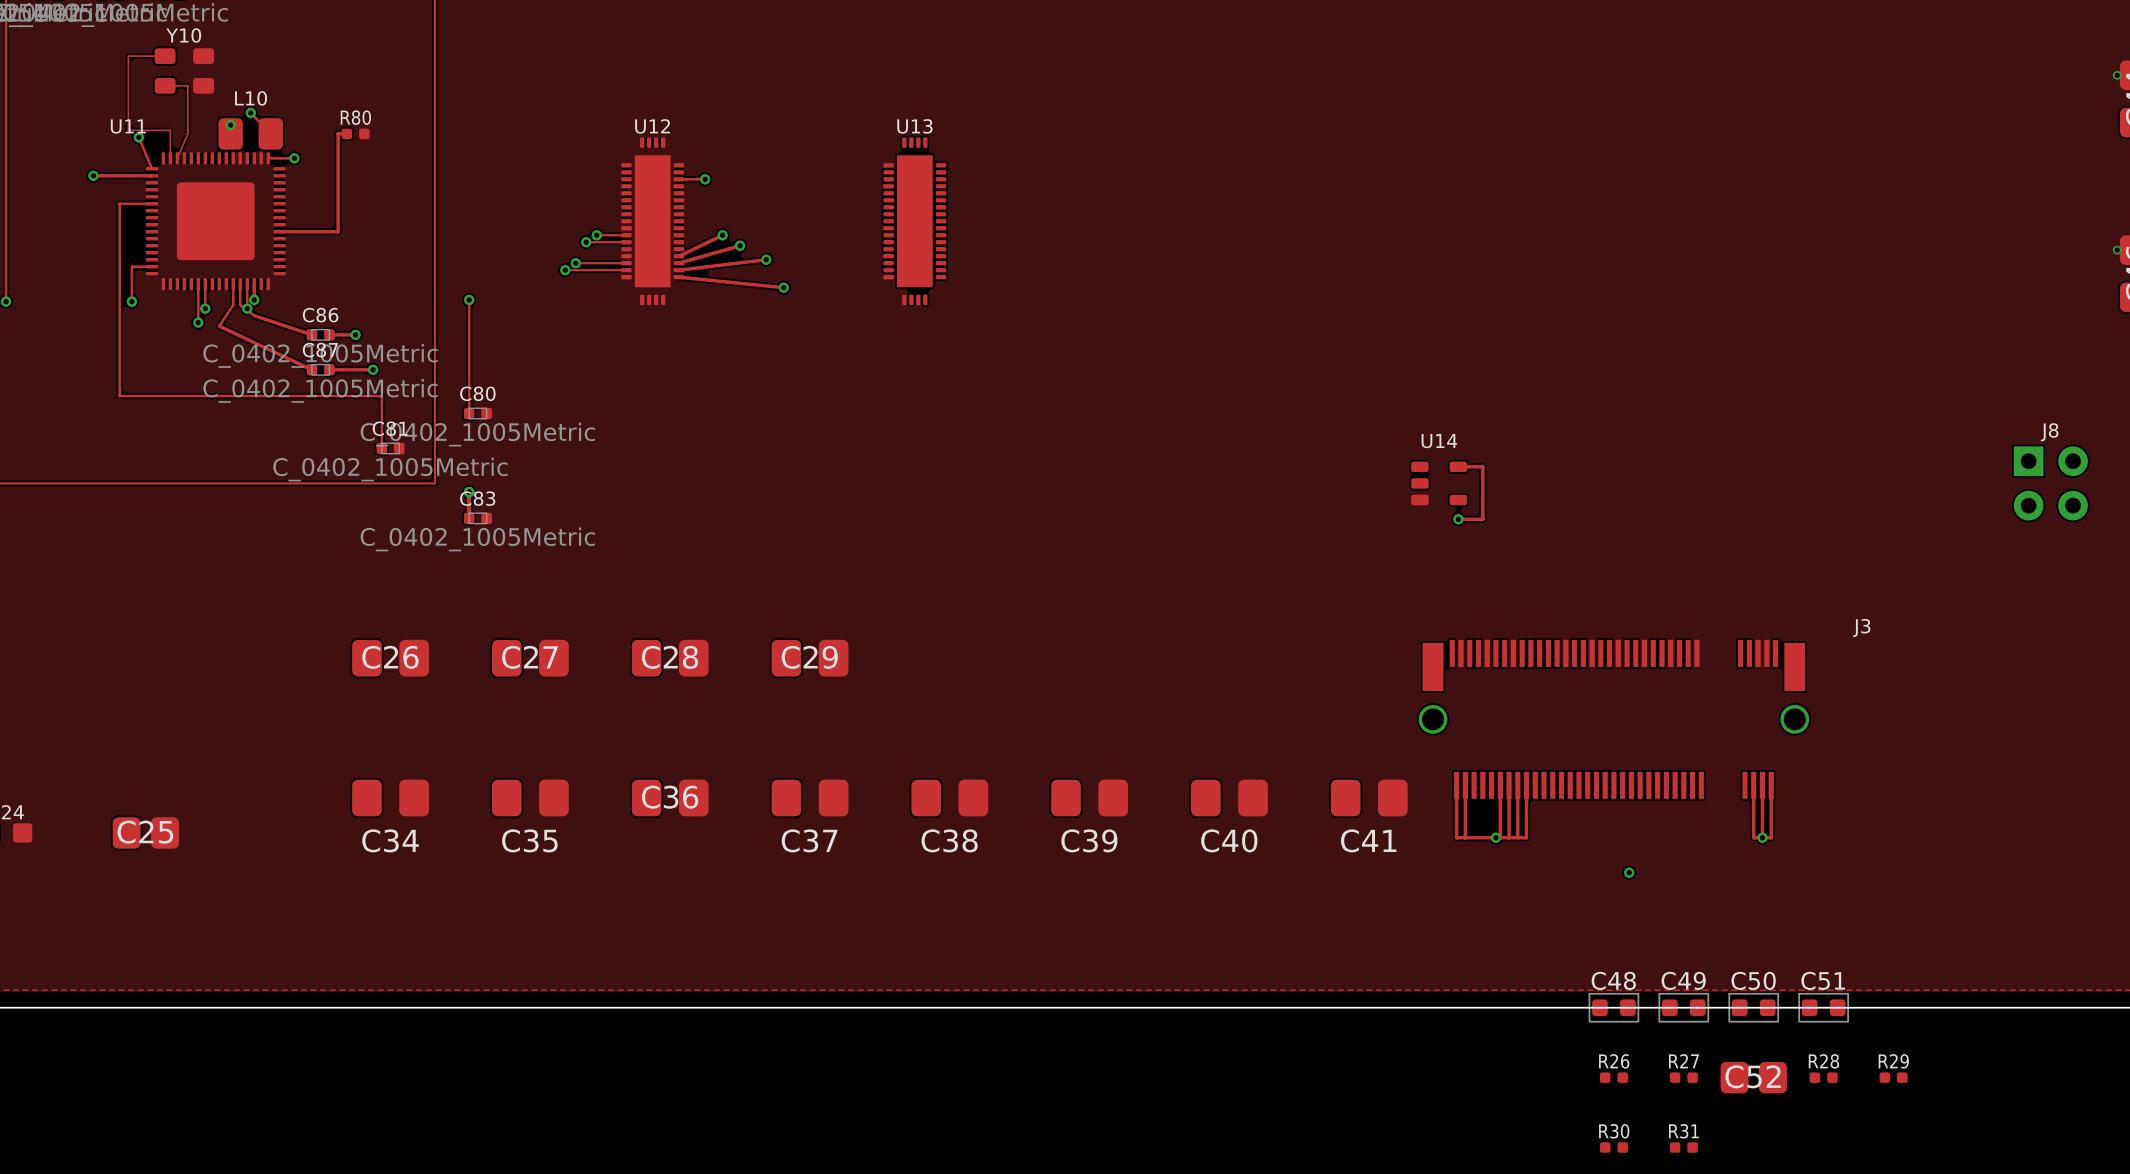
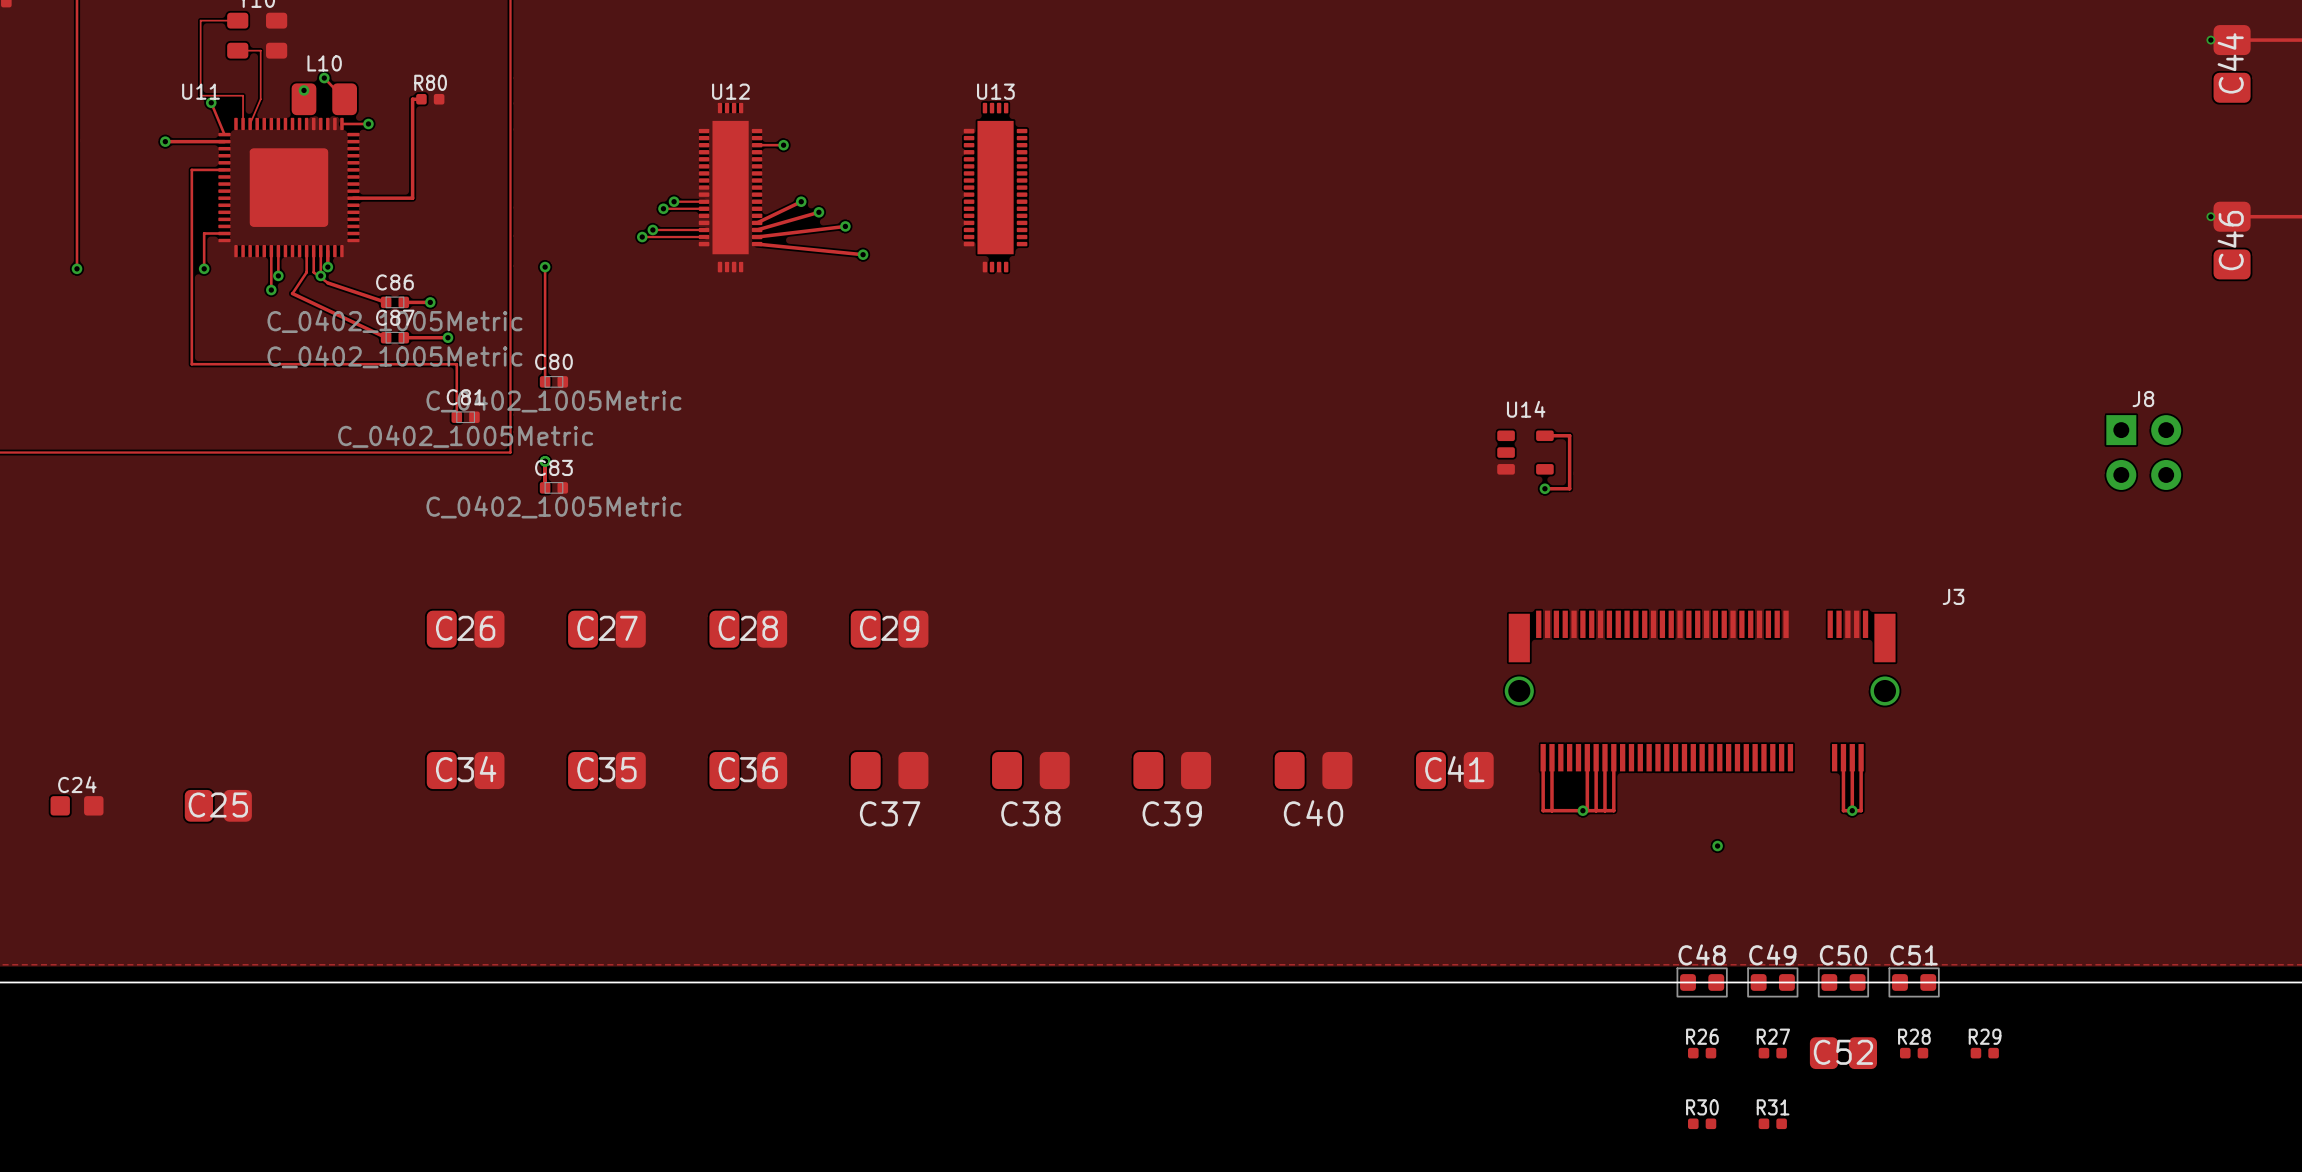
C34 name position: C34 (390, 840) -> C34 (466, 769)
C35 name position: C35 (529, 840) -> C35 (606, 769)
C41 name position: C41 (1368, 840) -> C41 (1454, 769)

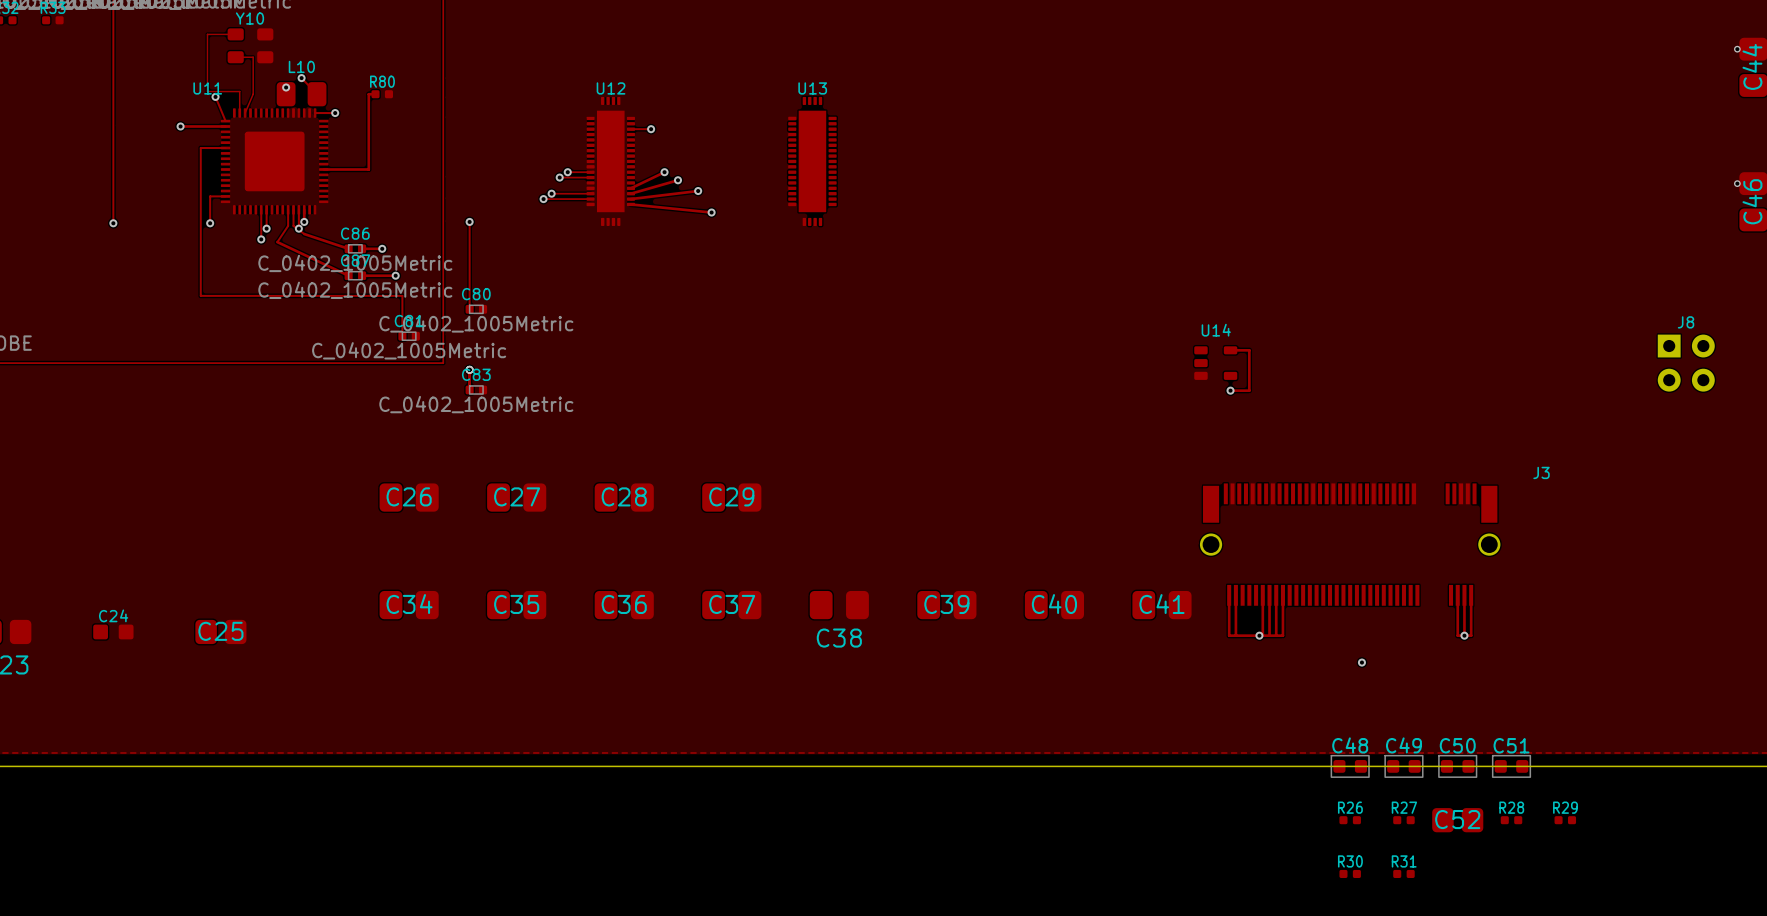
C37 name position: C37 (890, 813) -> C37 (732, 604)
C39 name position: C39 (1172, 813) -> C39 (946, 604)
C40 name position: C40 (1313, 813) -> C40 (1054, 604)

